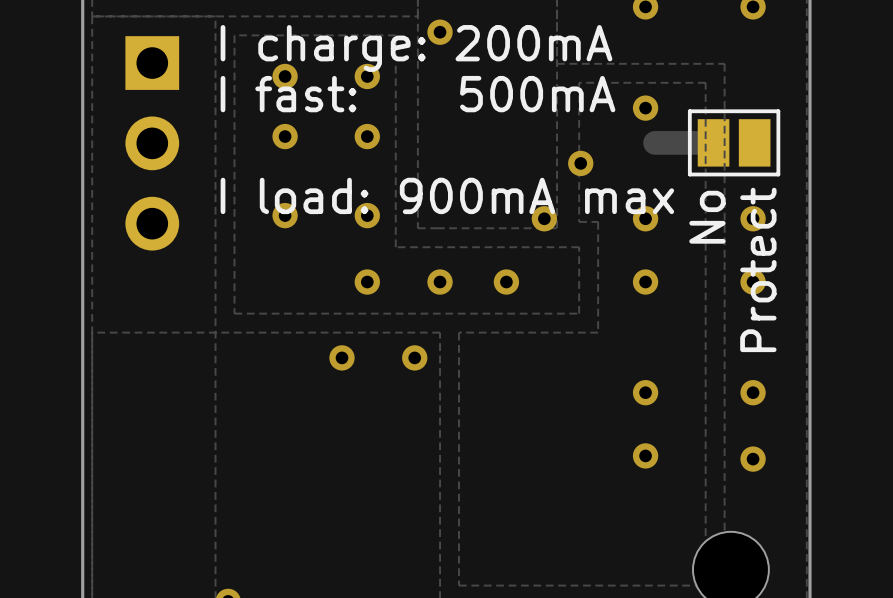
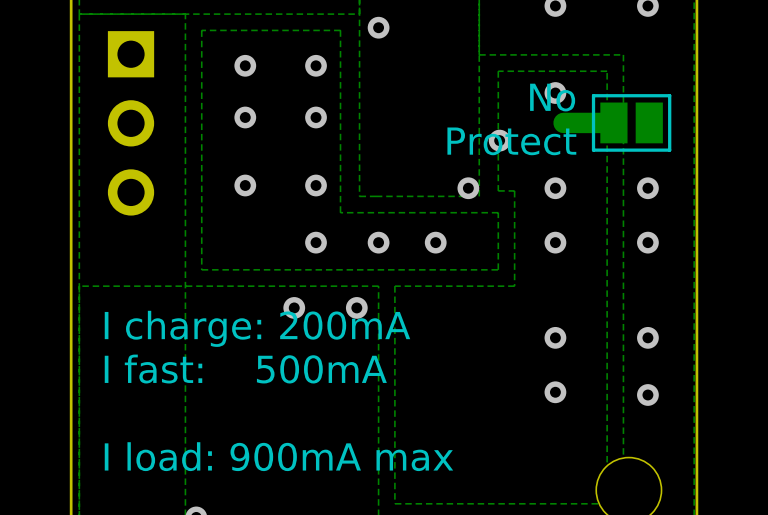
text position: I charge: 200mA (416, 48) -> I charge: 200mA (257, 328)
text position: I fast: 500mA (418, 94) -> I fast: 500mA (245, 369)
text position: I load: 900mA max (447, 195) -> I load: 900mA max (278, 456)
text rotation: 0° (707, 217) -> 90° clockwise (552, 97)
text position: No (707, 217) -> No (552, 97)
text rotation: 0° (758, 269) -> 90° clockwise (511, 141)
text position: Protect (758, 269) -> Protect (511, 141)

